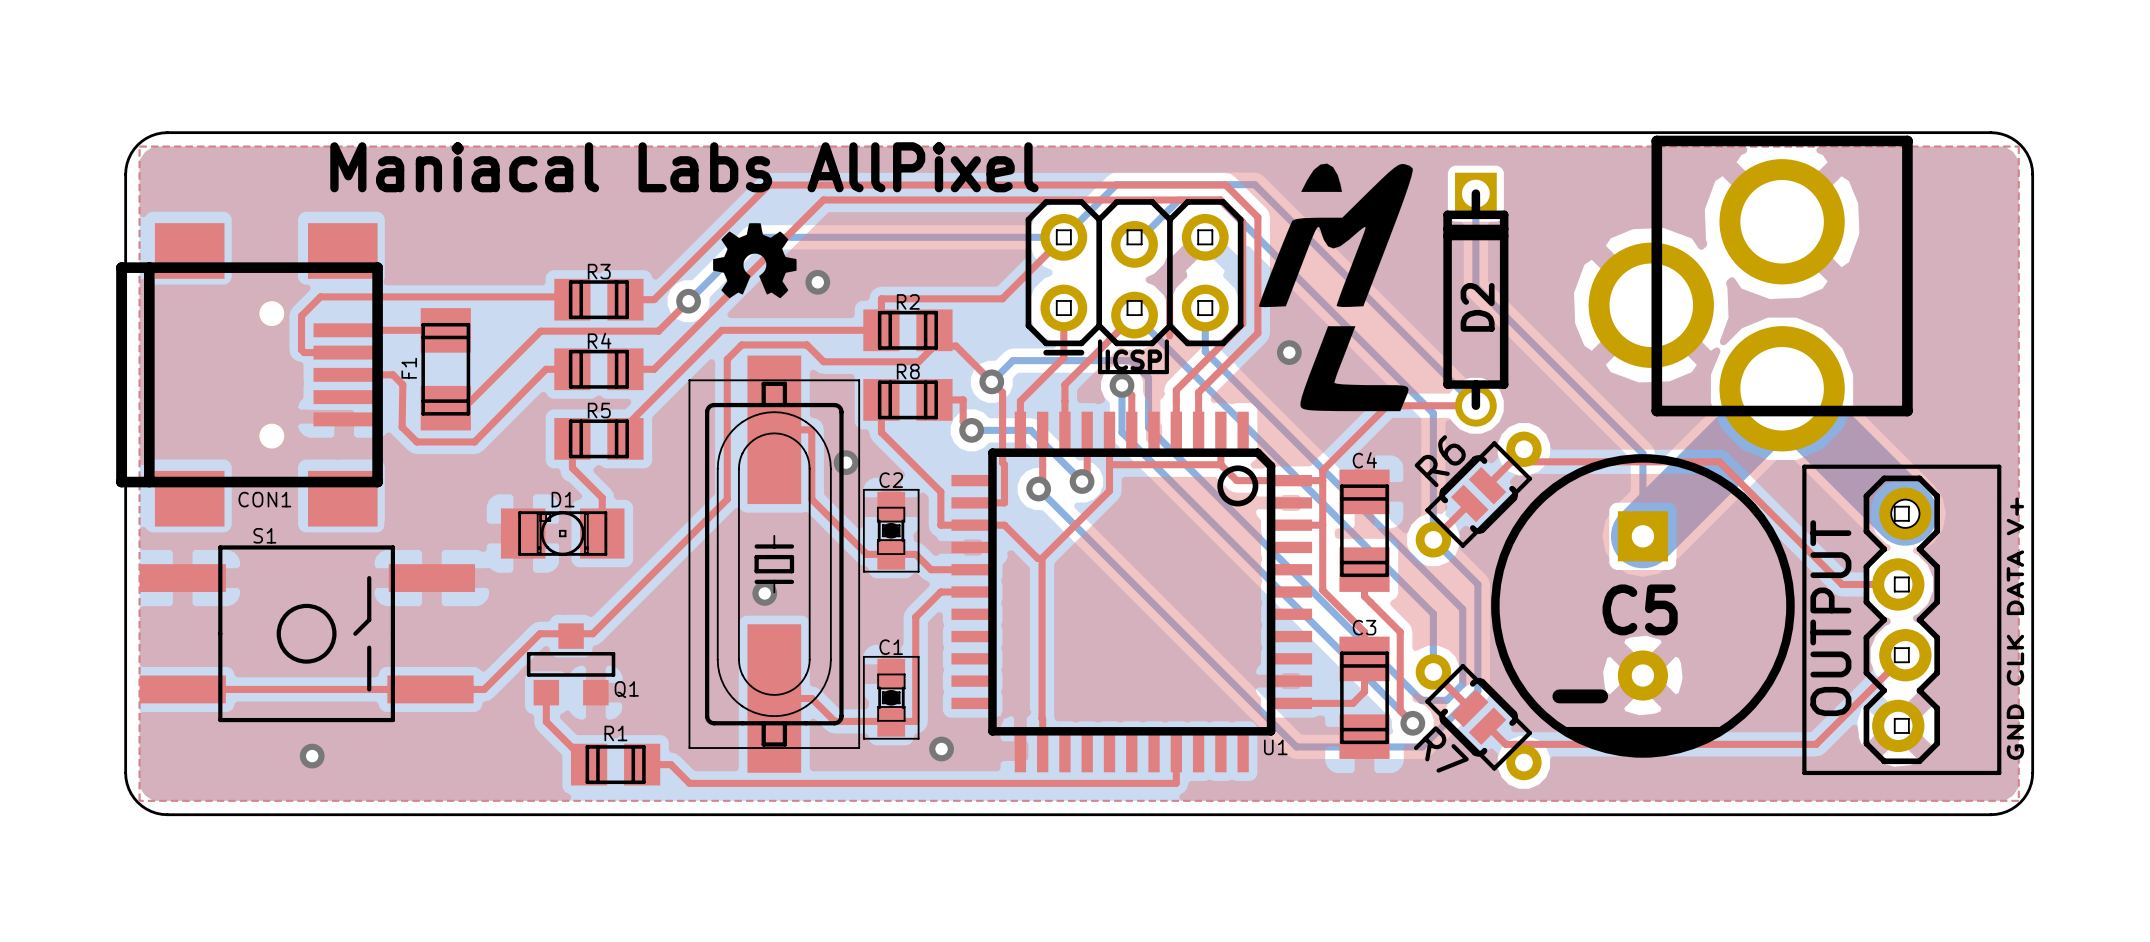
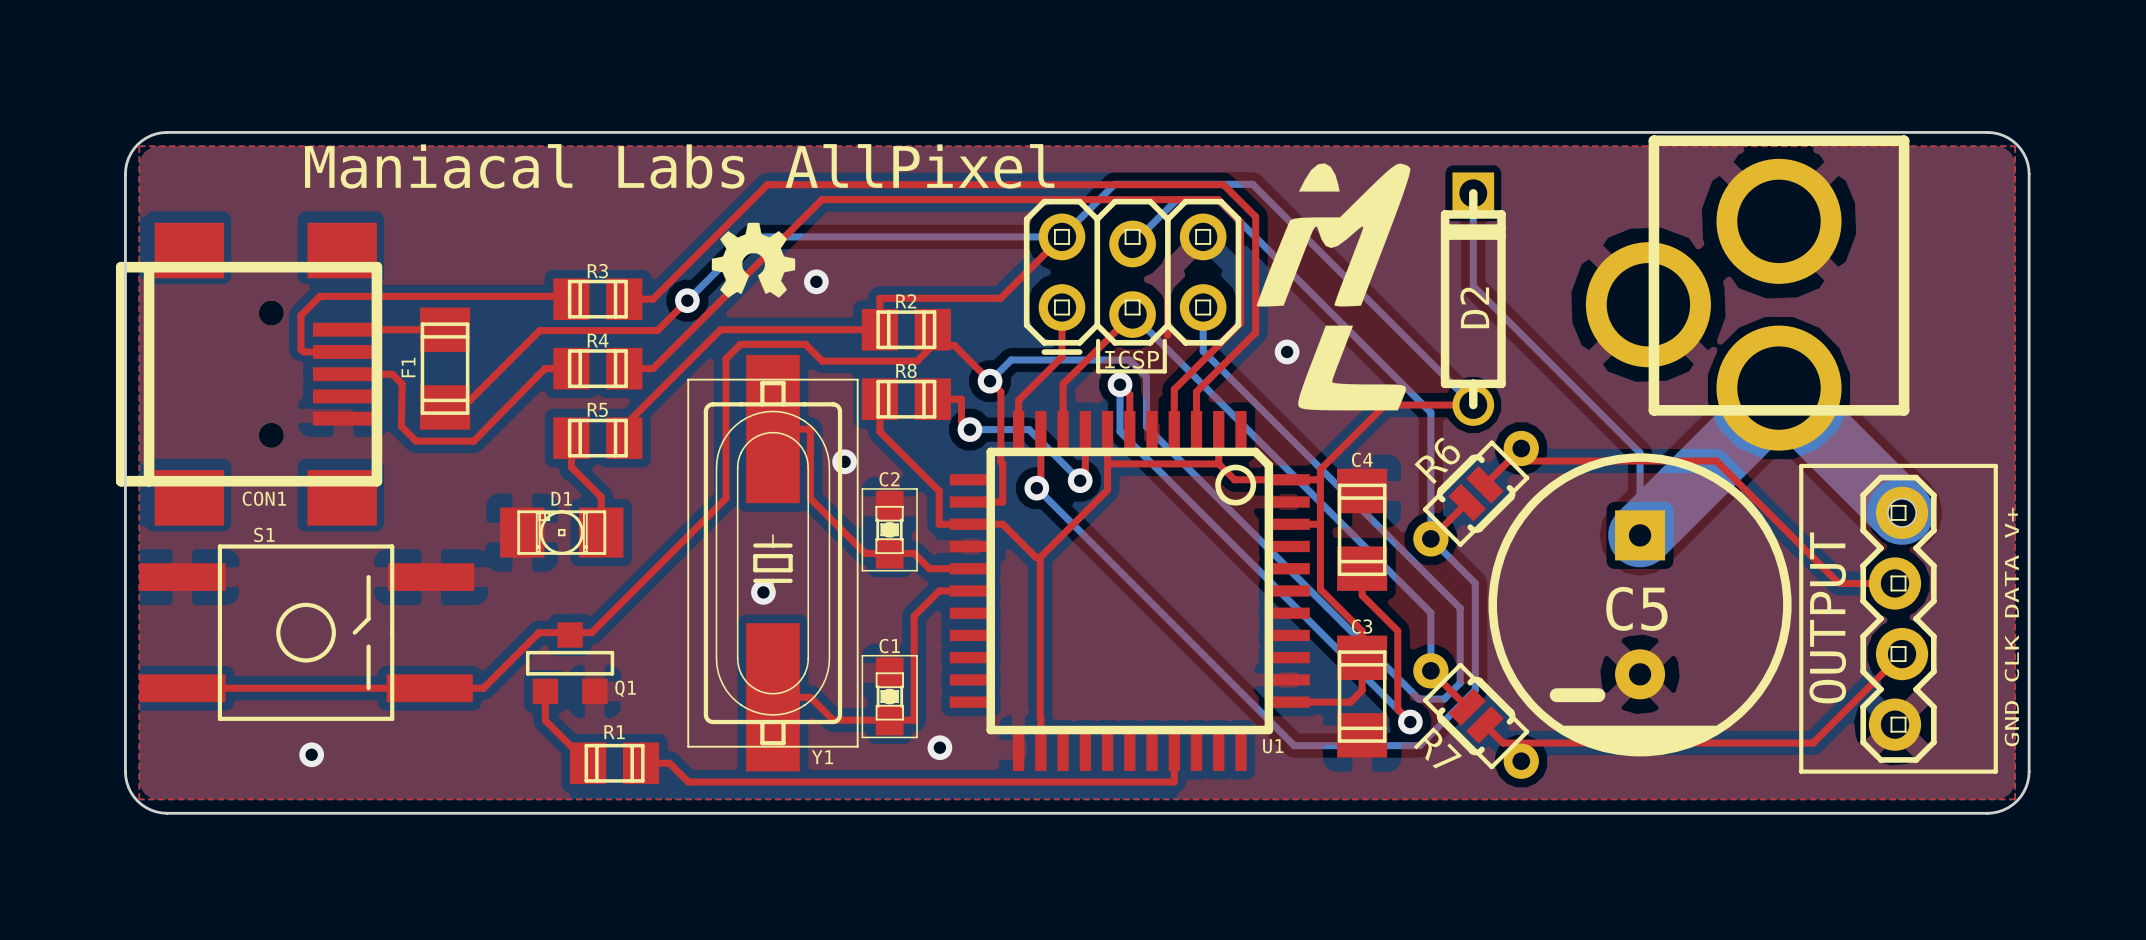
Y1 name: none -> Y1 (822, 757)

